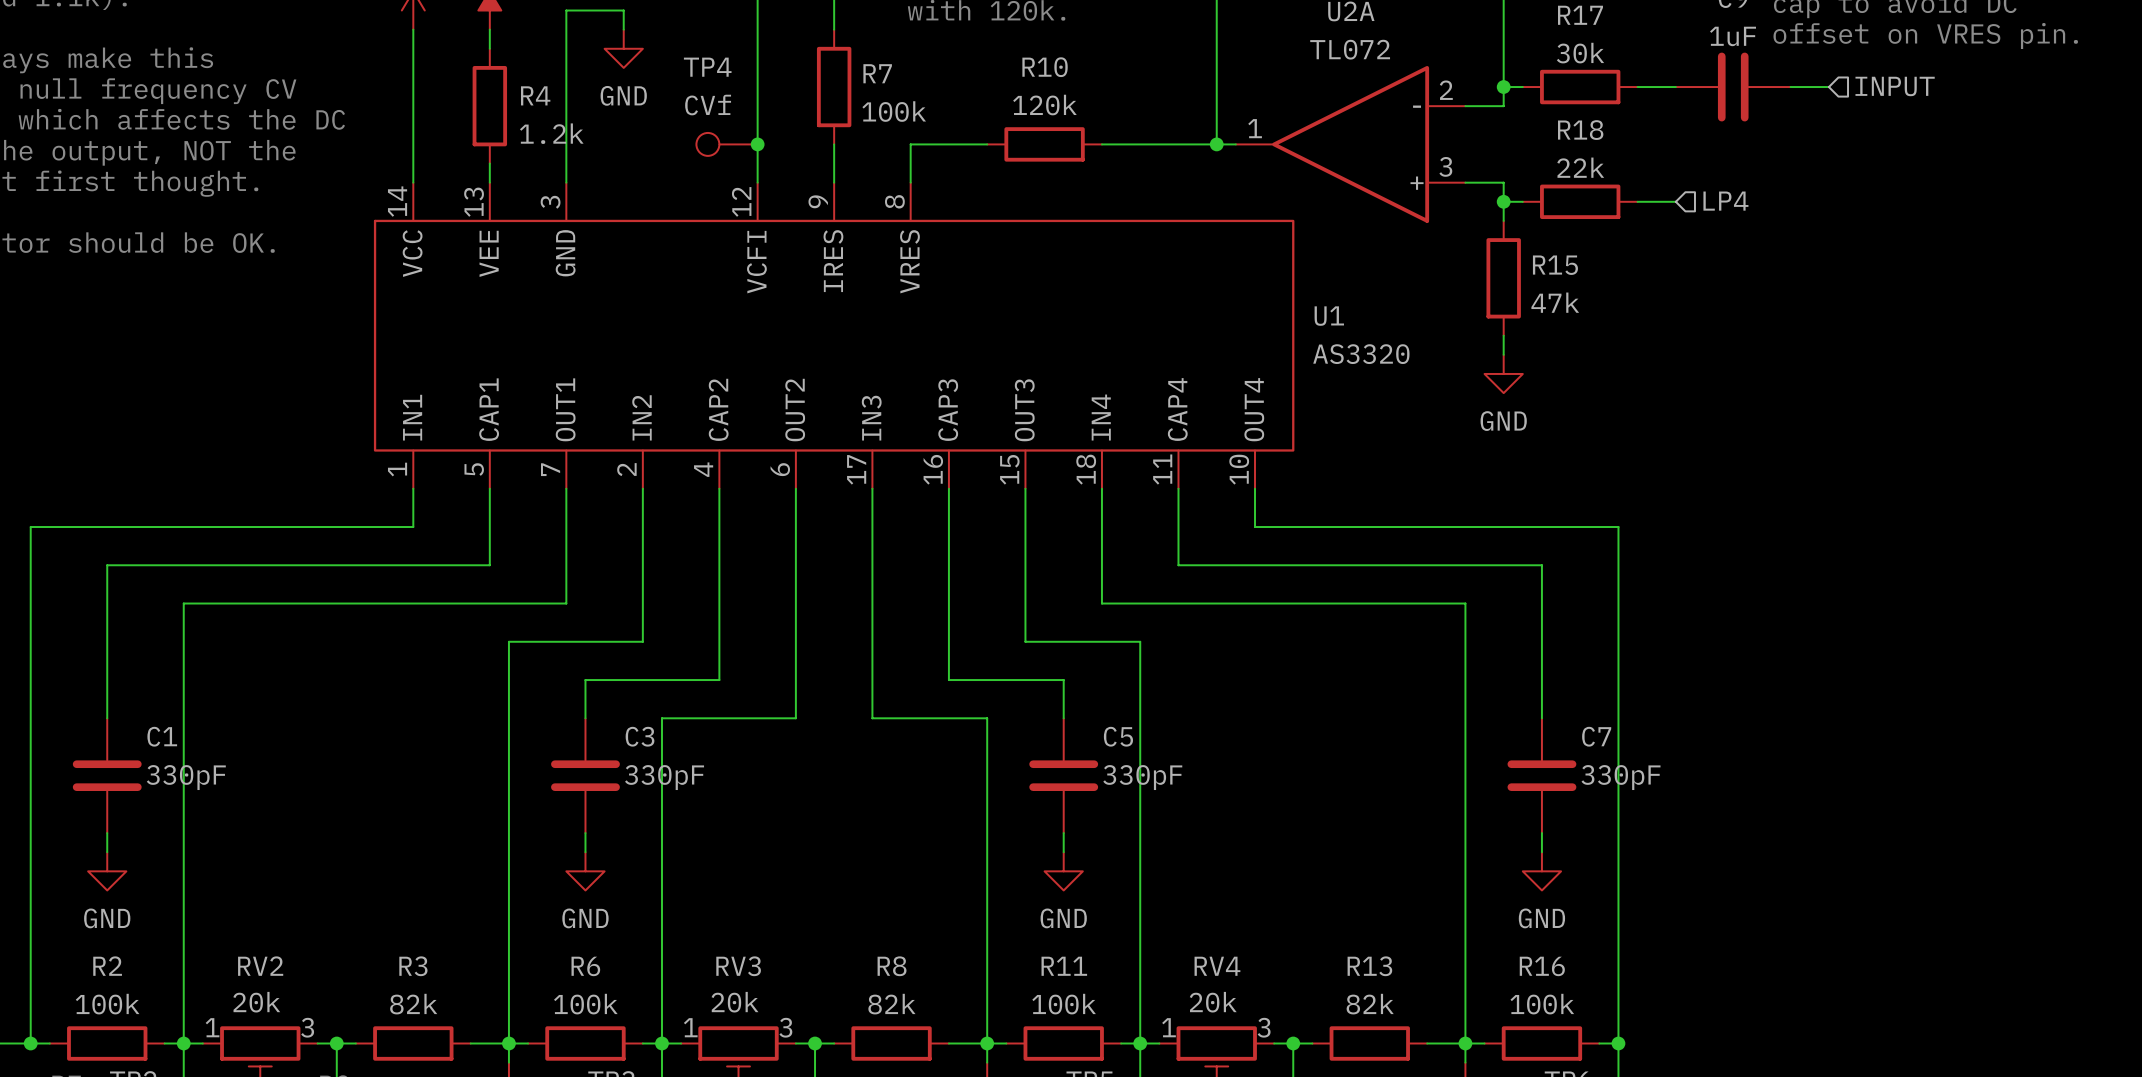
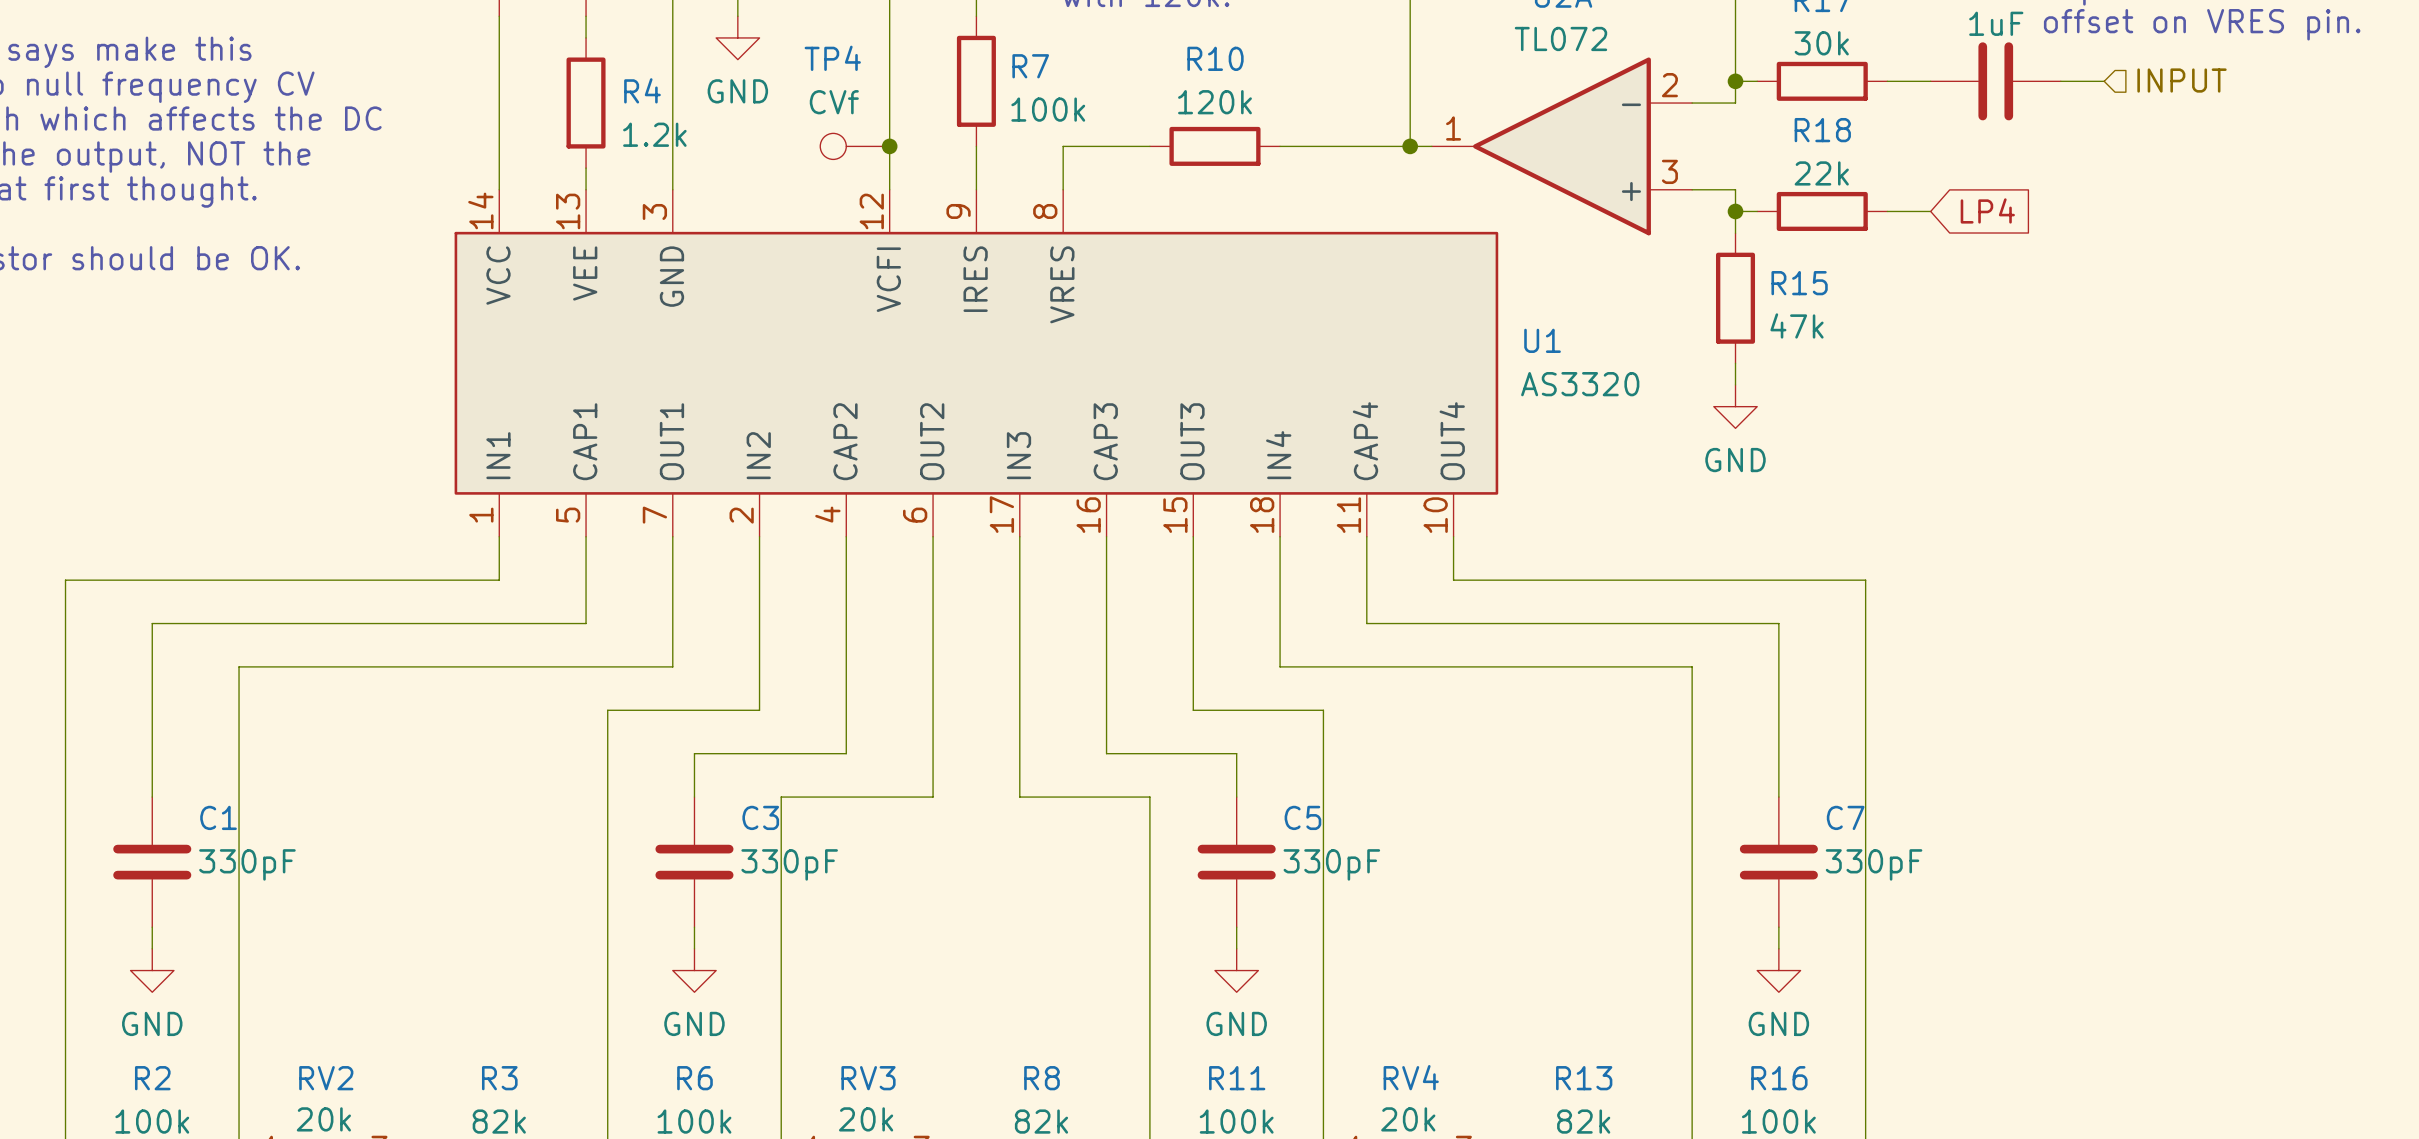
global label: none -> LP4 (1987, 210)
hierarchical label: LP4 (1725, 201) -> none

